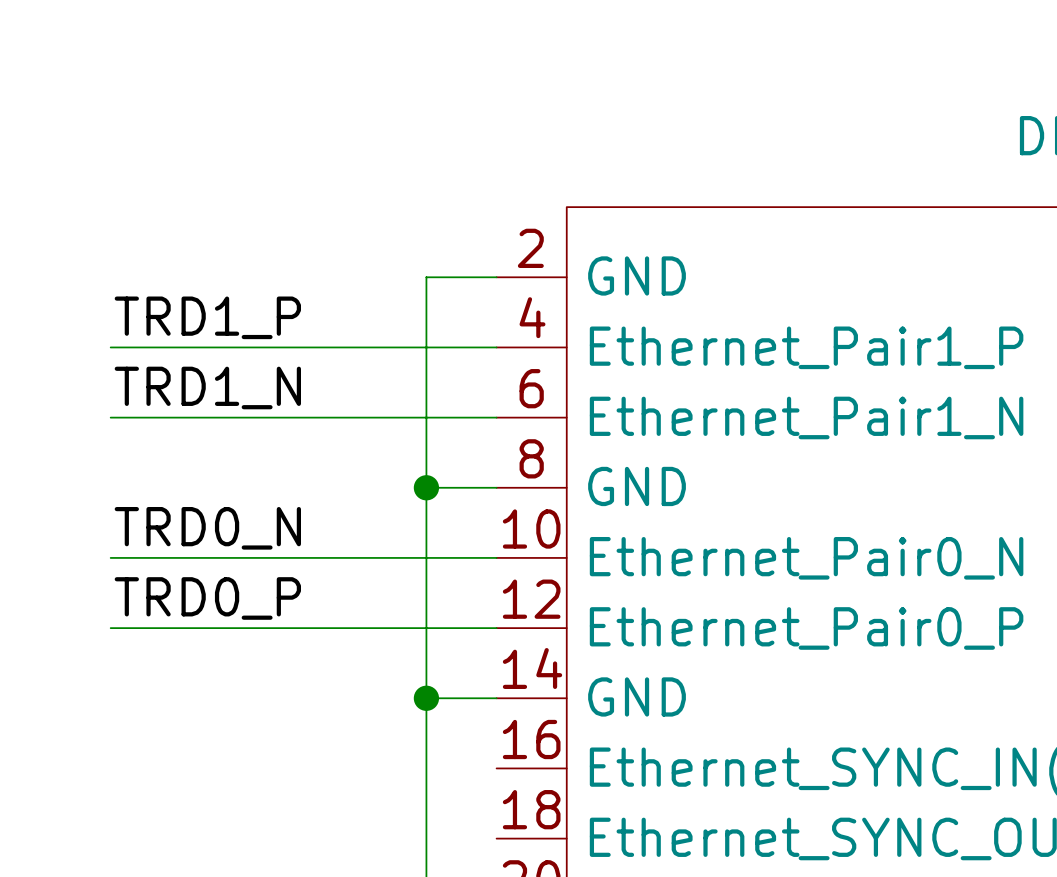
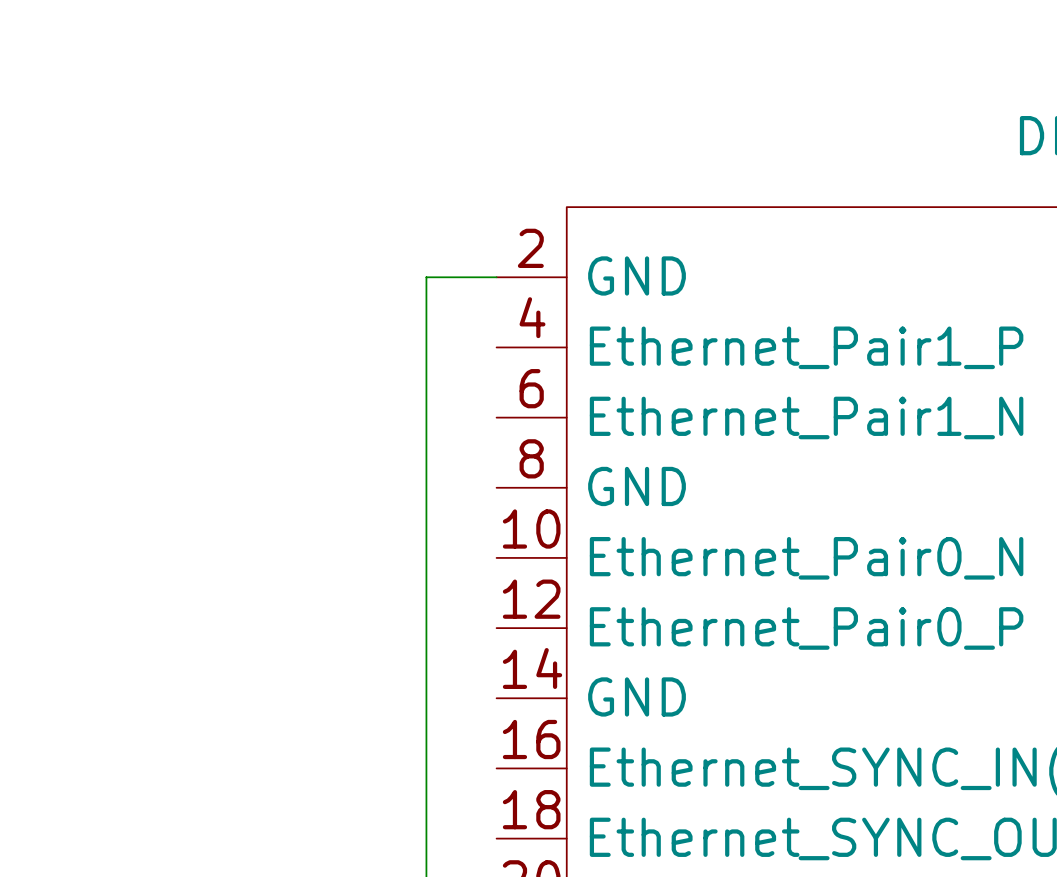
label: TRD1_P (207, 317) -> none
wire: (110, 347) (496, 347) -> none
label: TRD1_N (207, 387) -> none
wire: (110, 417) (496, 417) -> none
wire: (426, 487) (496, 487) -> none
junction: (426, 487) -> none
label: TRD0_N (207, 528) -> none
wire: (110, 557) (496, 557) -> none
label: TRD0_P (207, 598) -> none
wire: (110, 628) (496, 628) -> none
wire: (426, 698) (496, 698) -> none
junction: (426, 698) -> none

